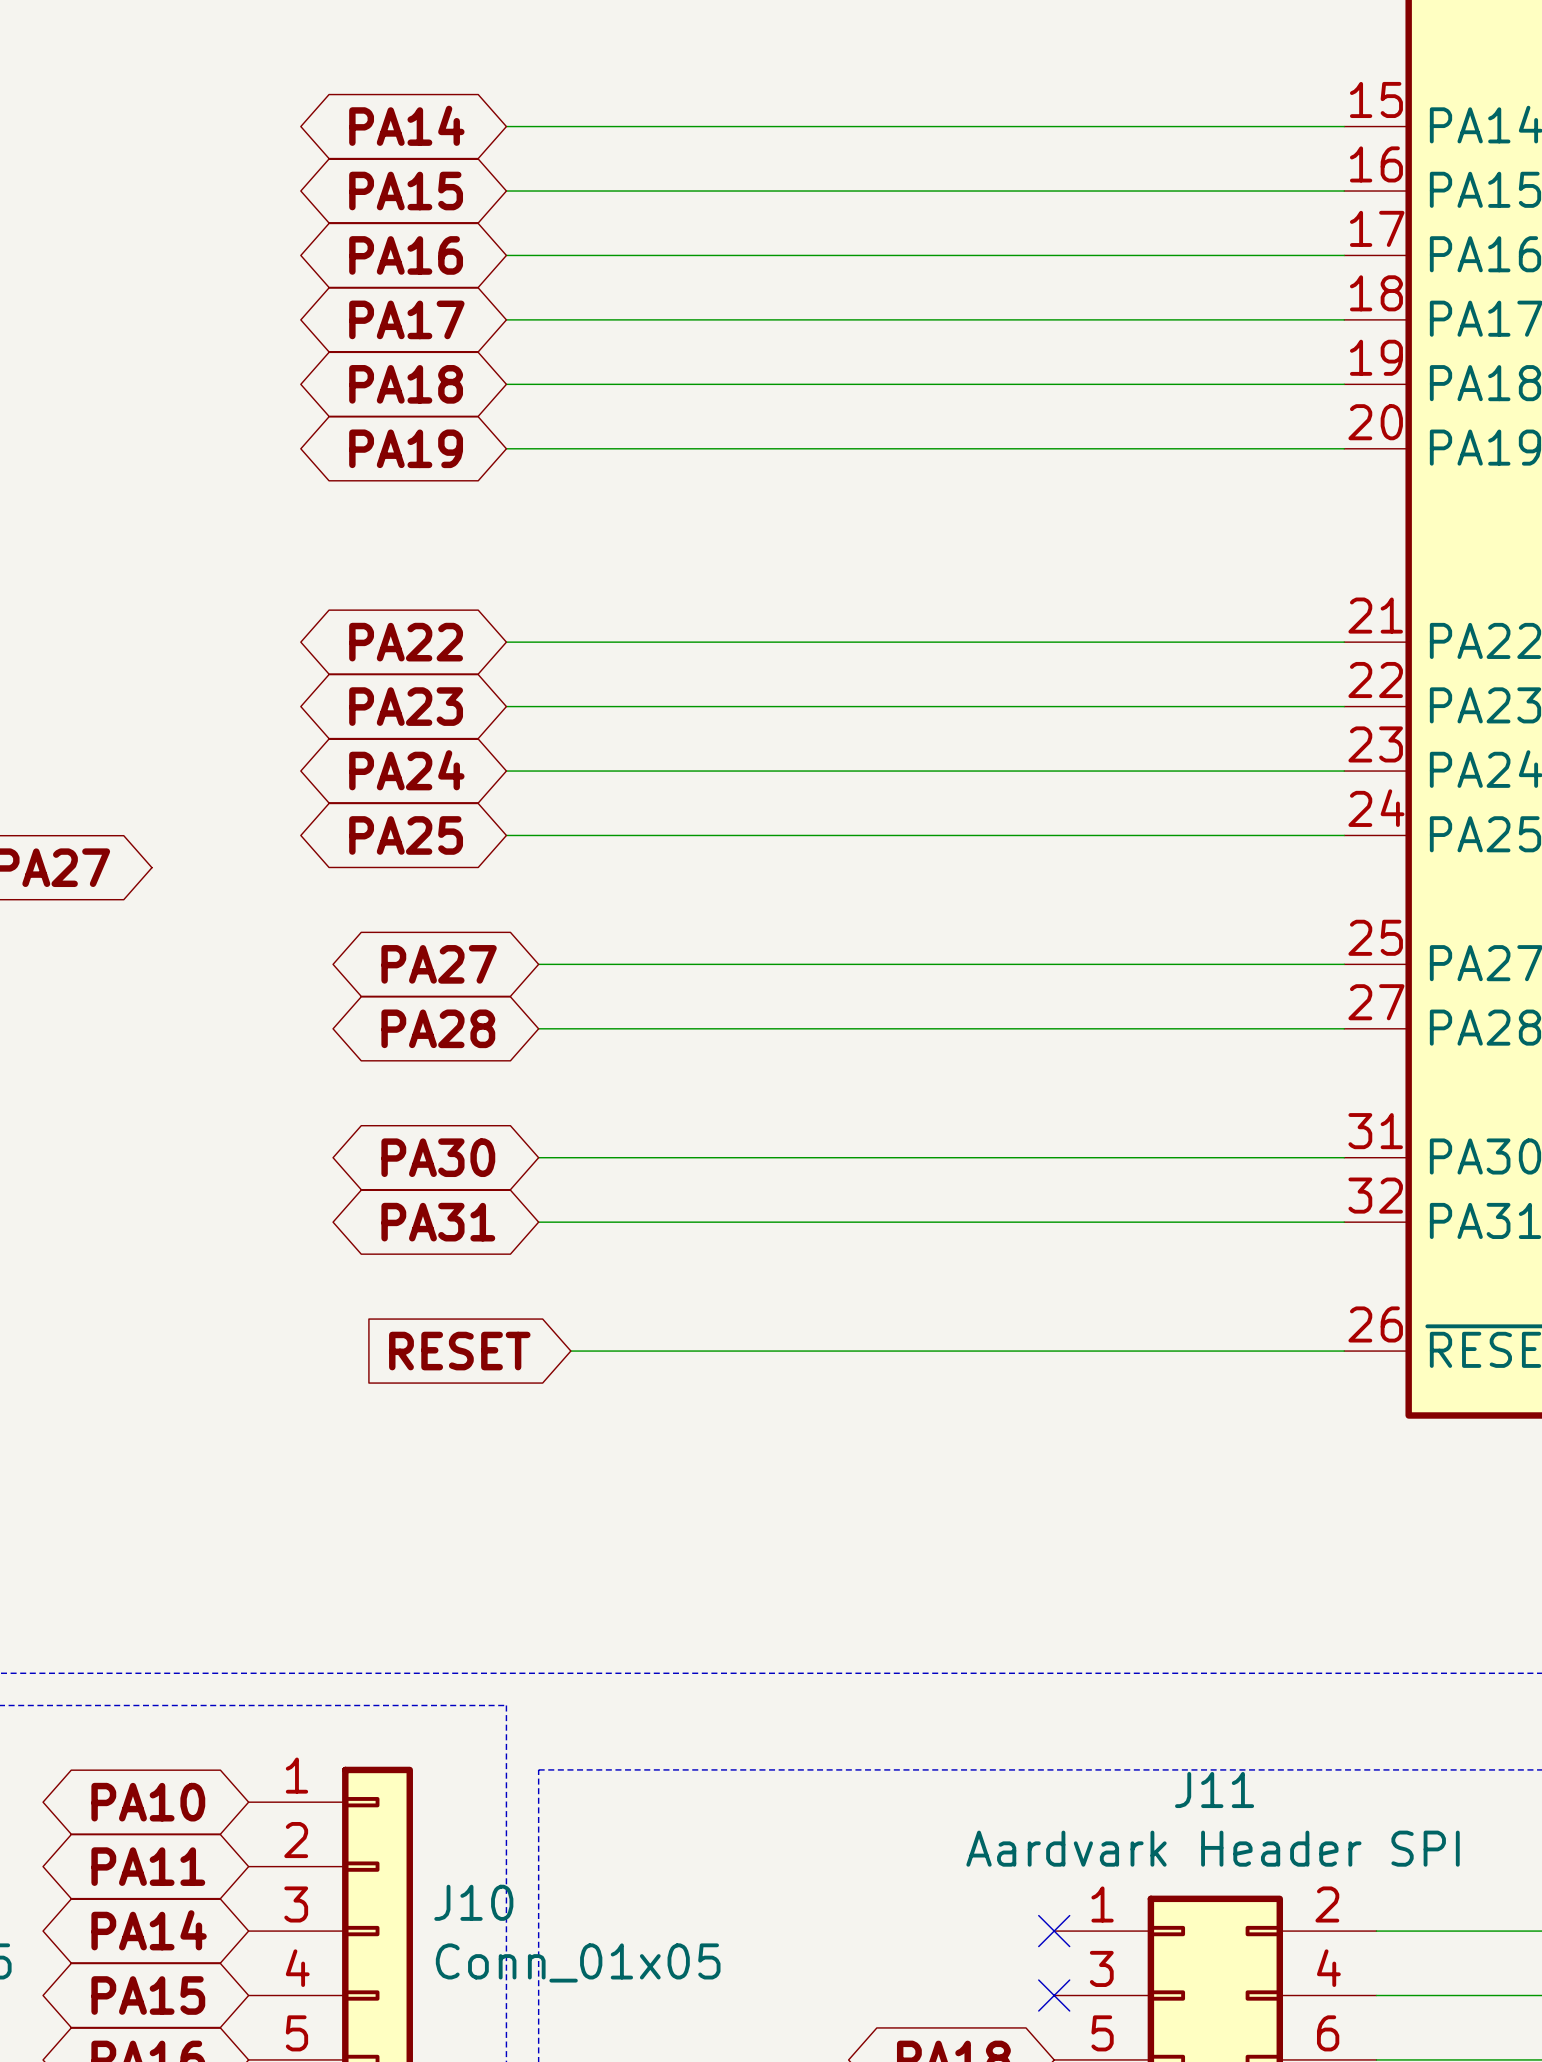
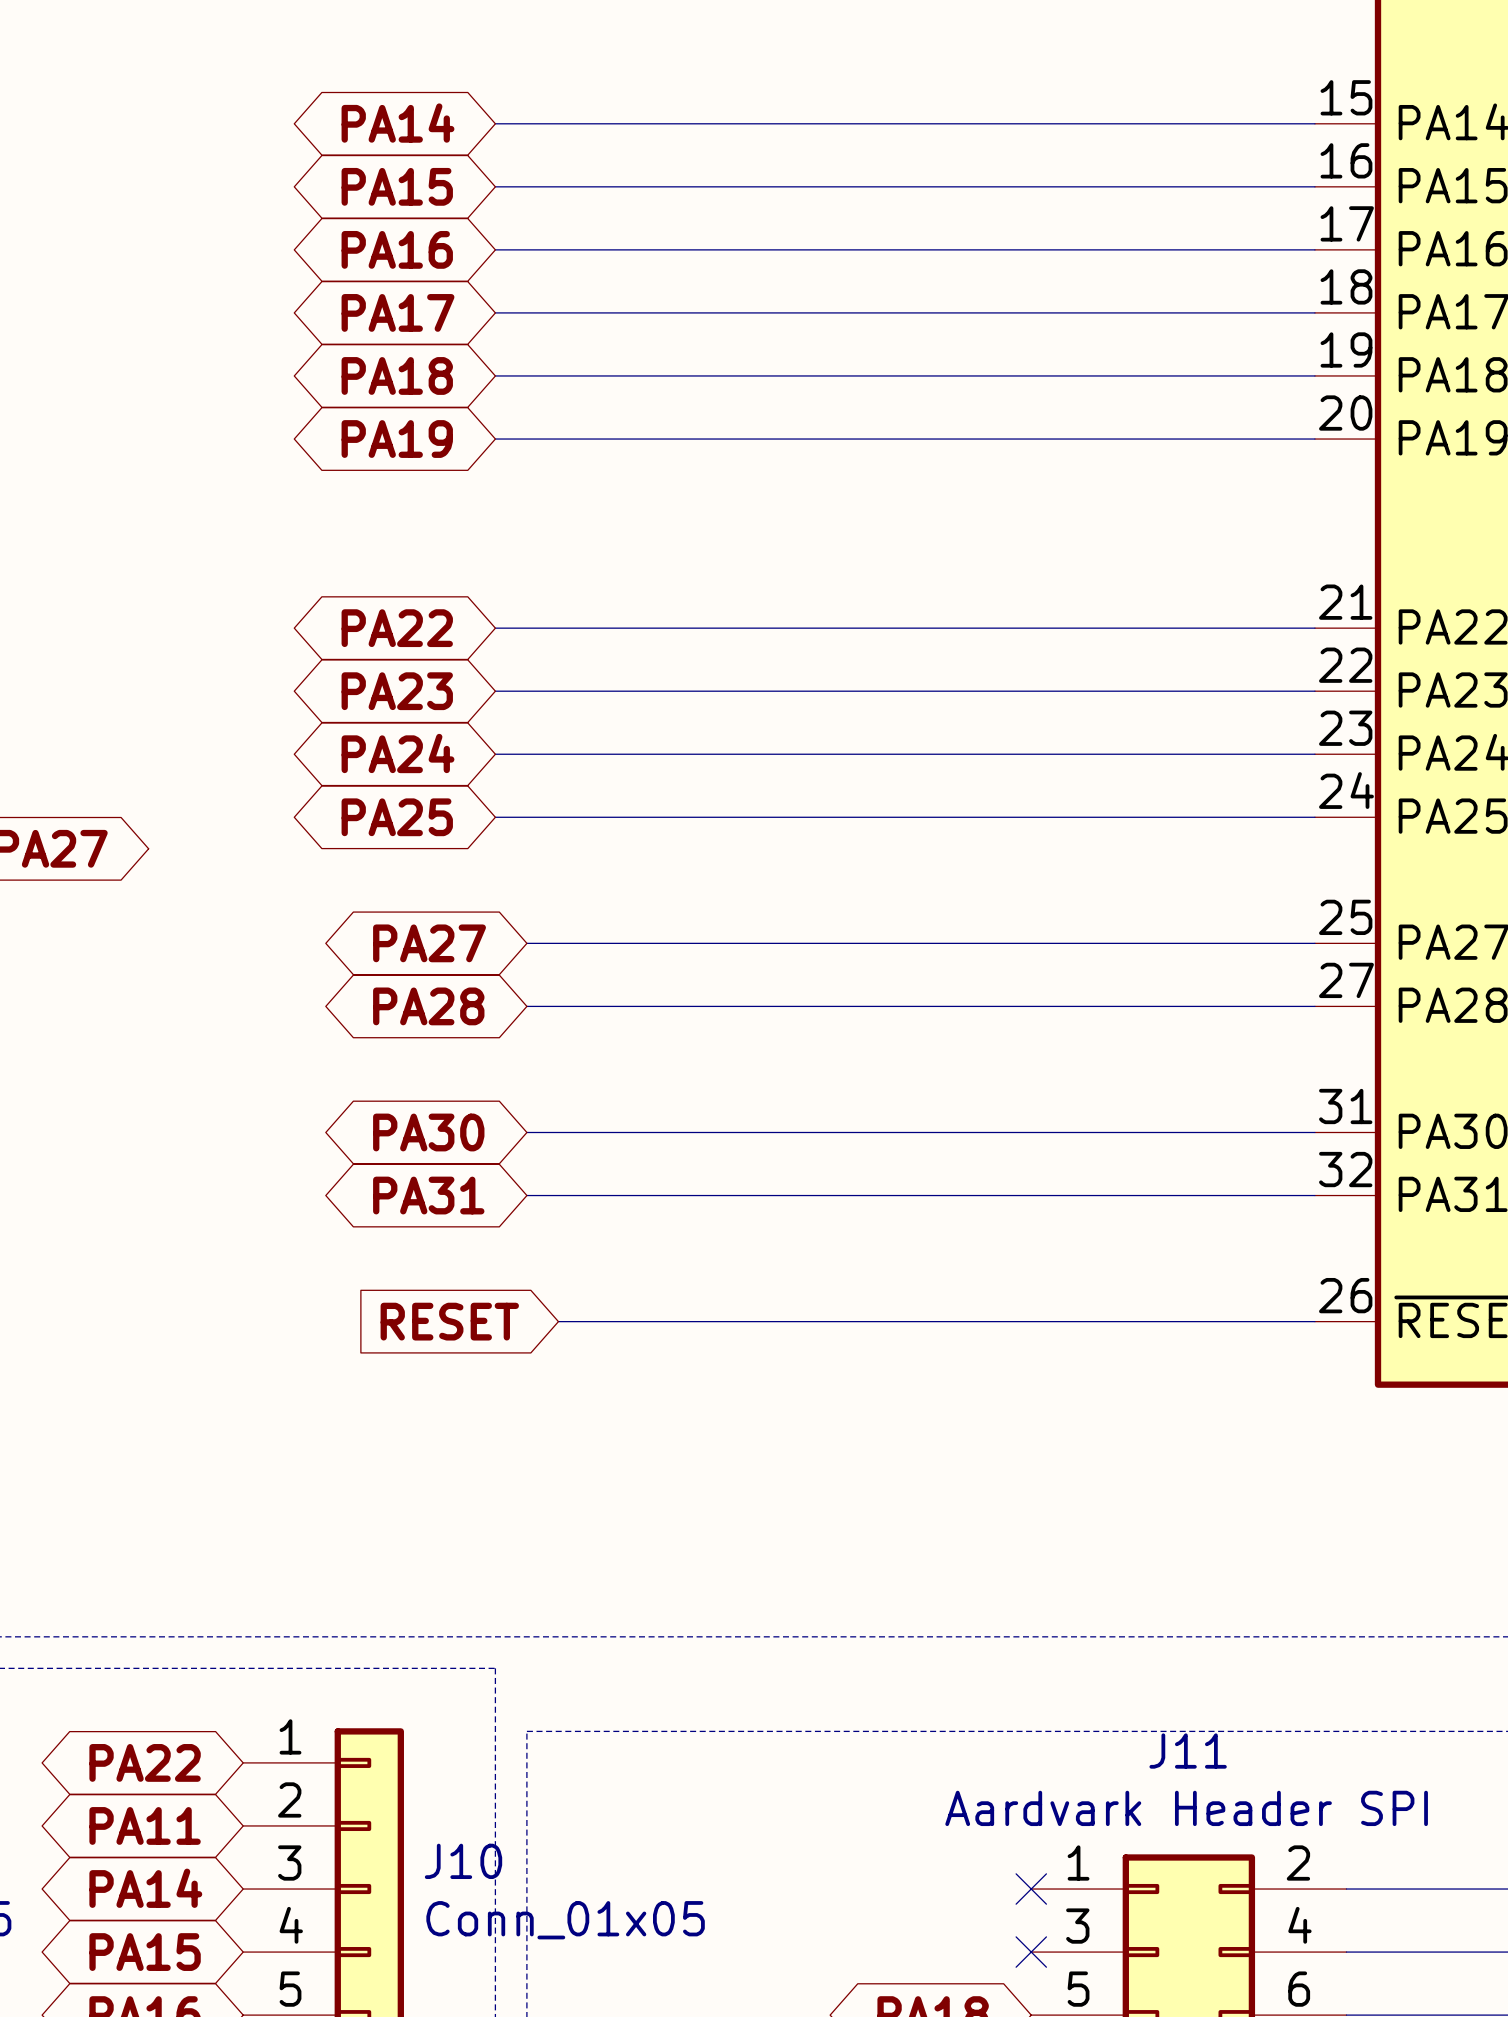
global label: PA10 (148, 1802) -> PA22 (145, 1762)

